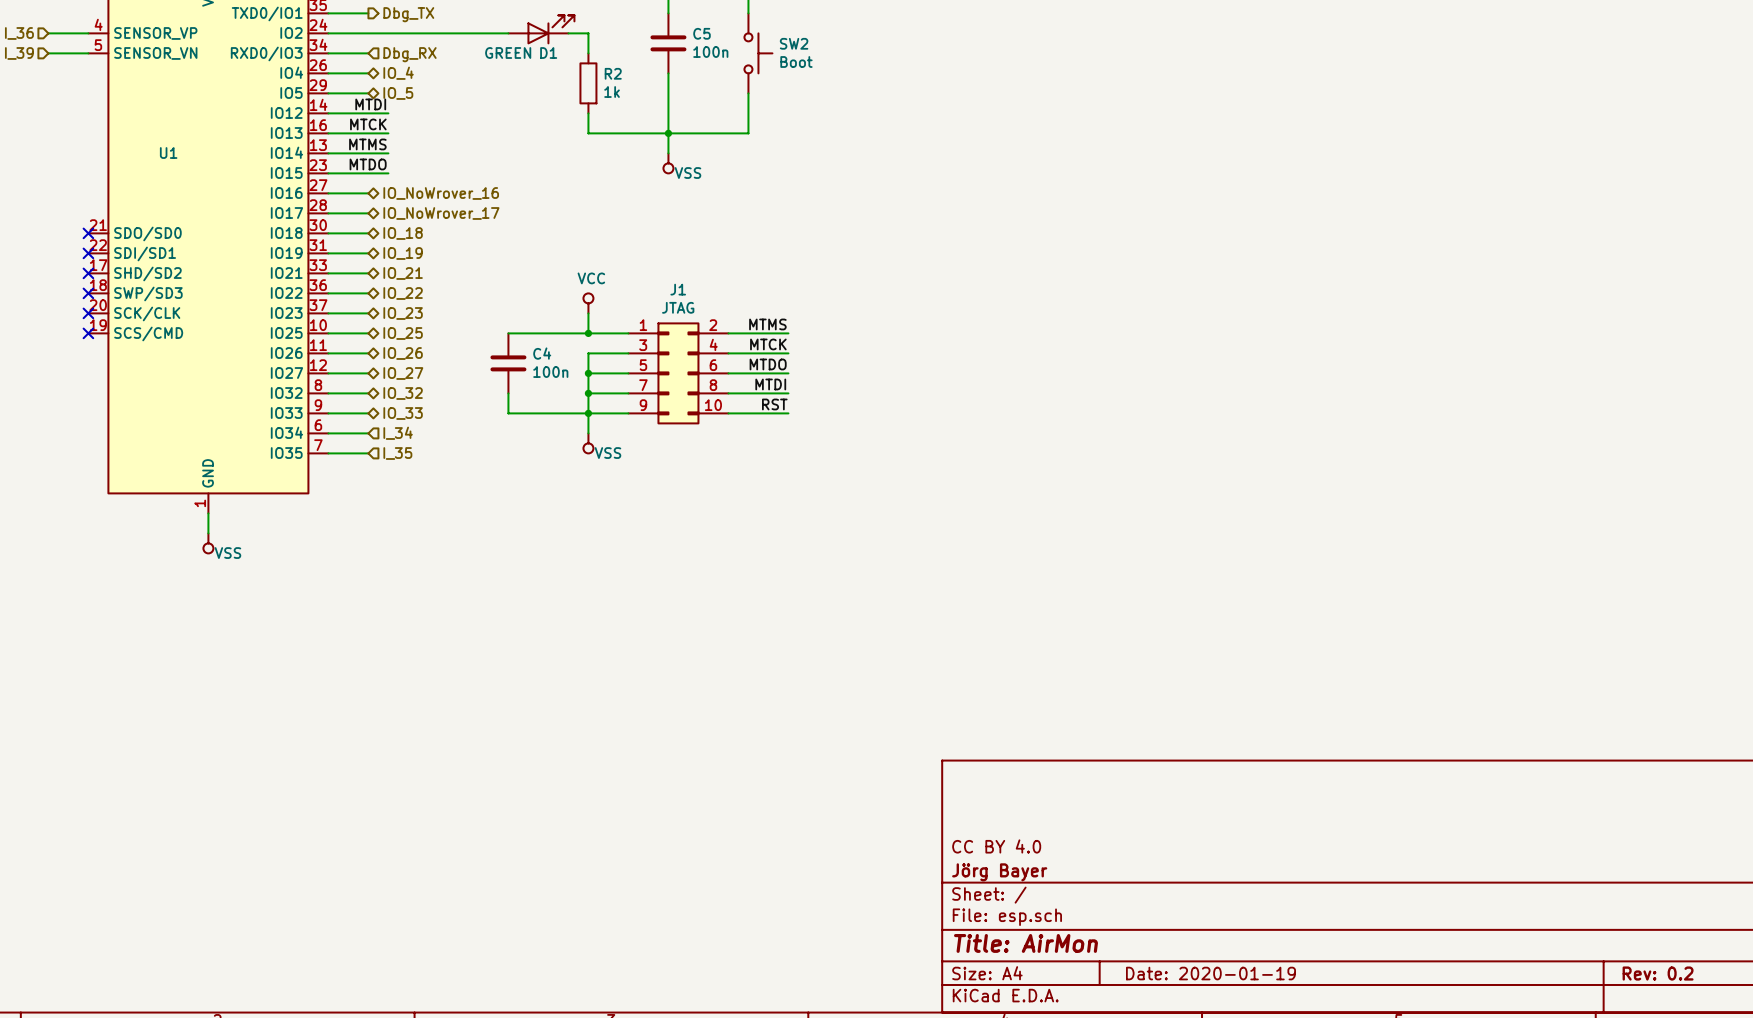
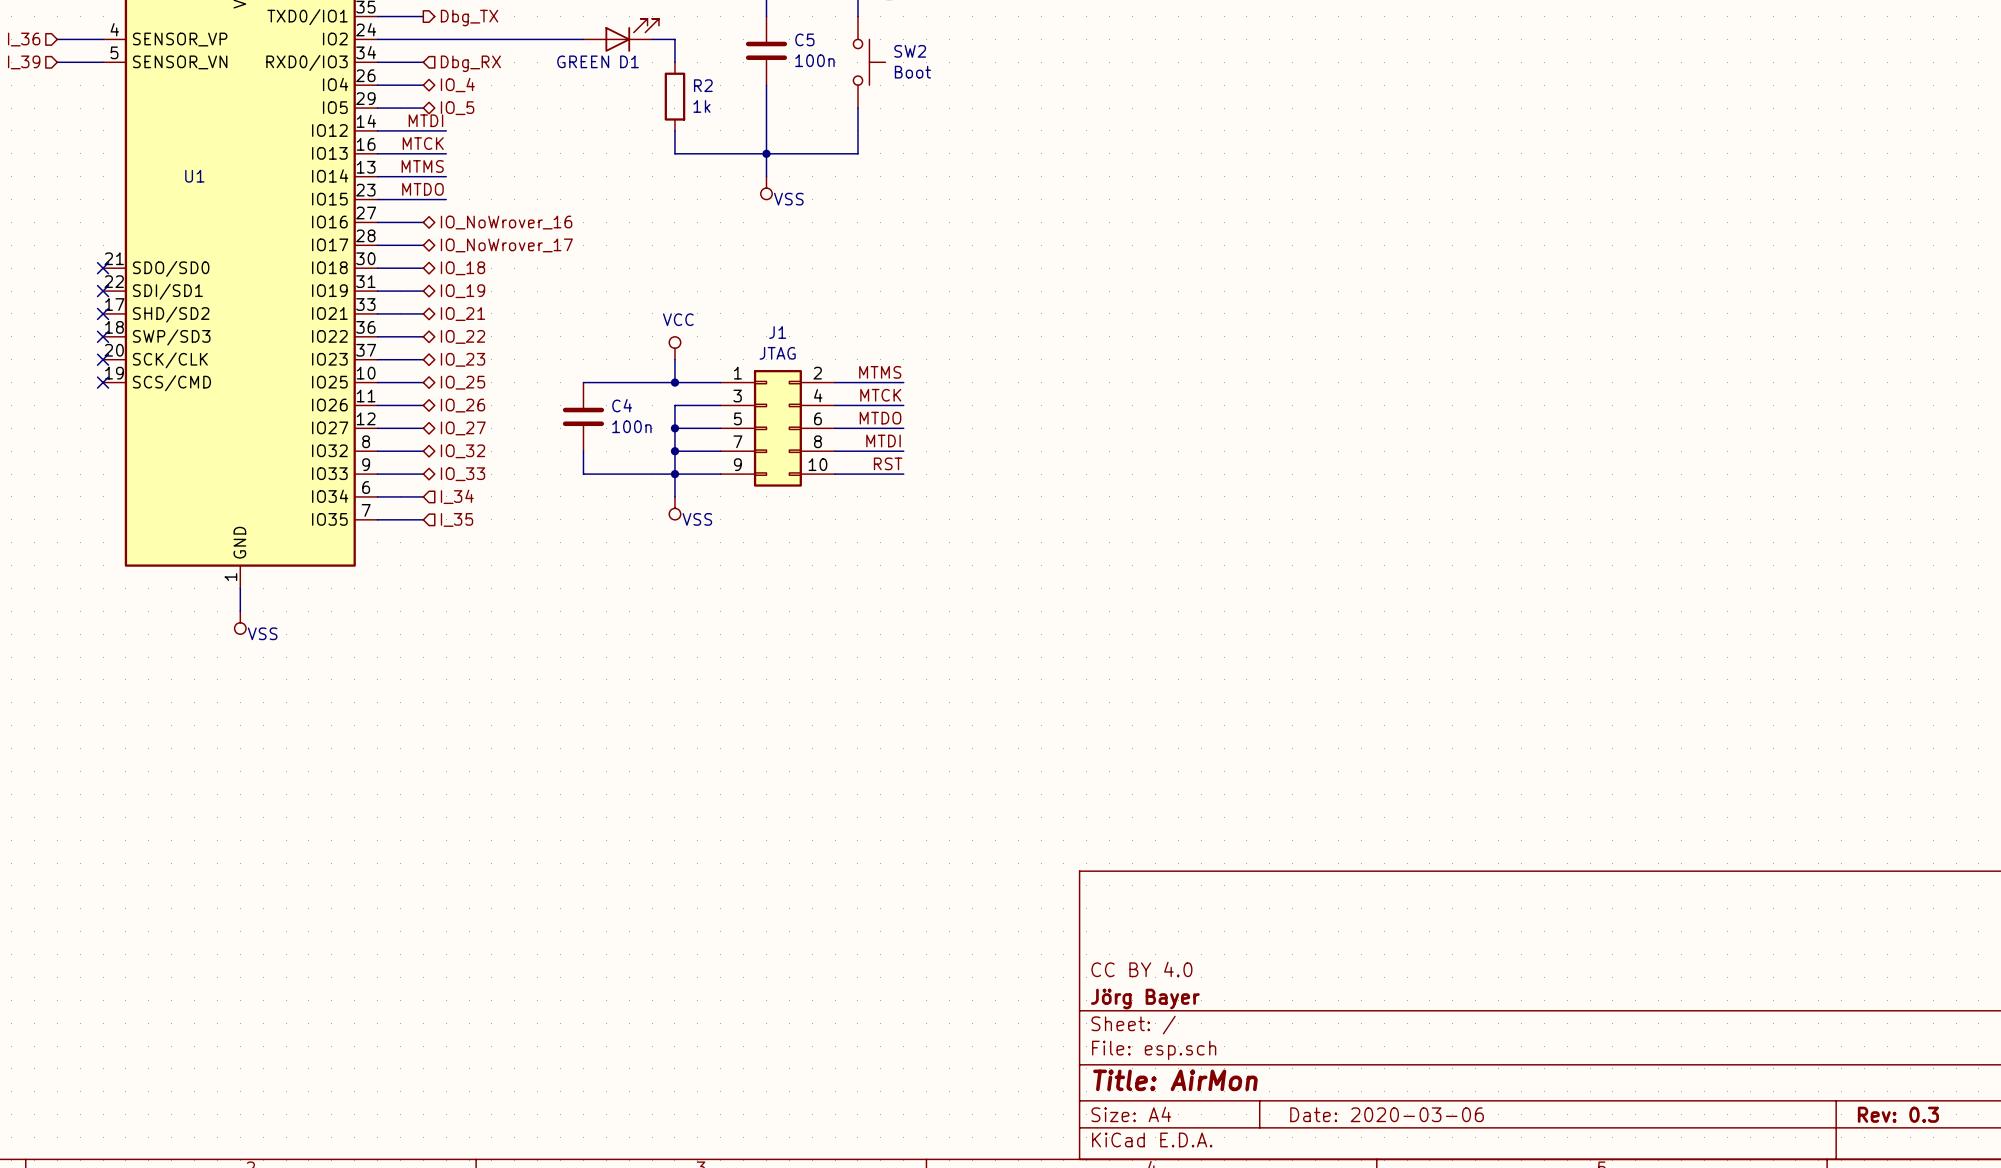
title block: Date: 2020-01-19 (1210, 973) -> Date: 2020-03-06 (1387, 1114)
title block: Rev: 0.2 (1658, 973) -> Rev: 0.3 (1898, 1114)

